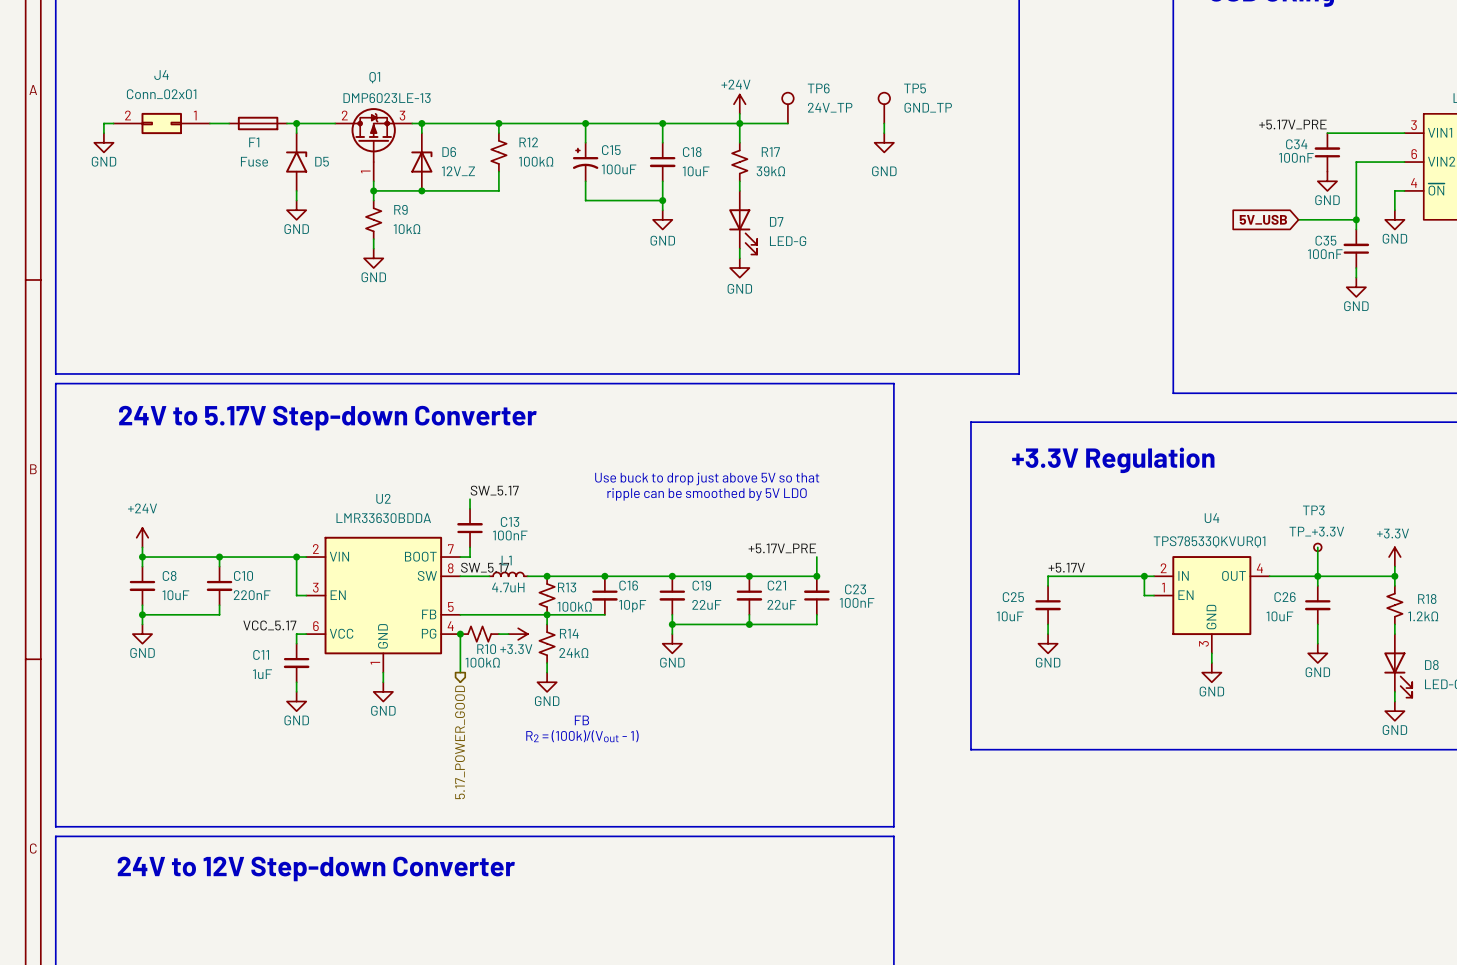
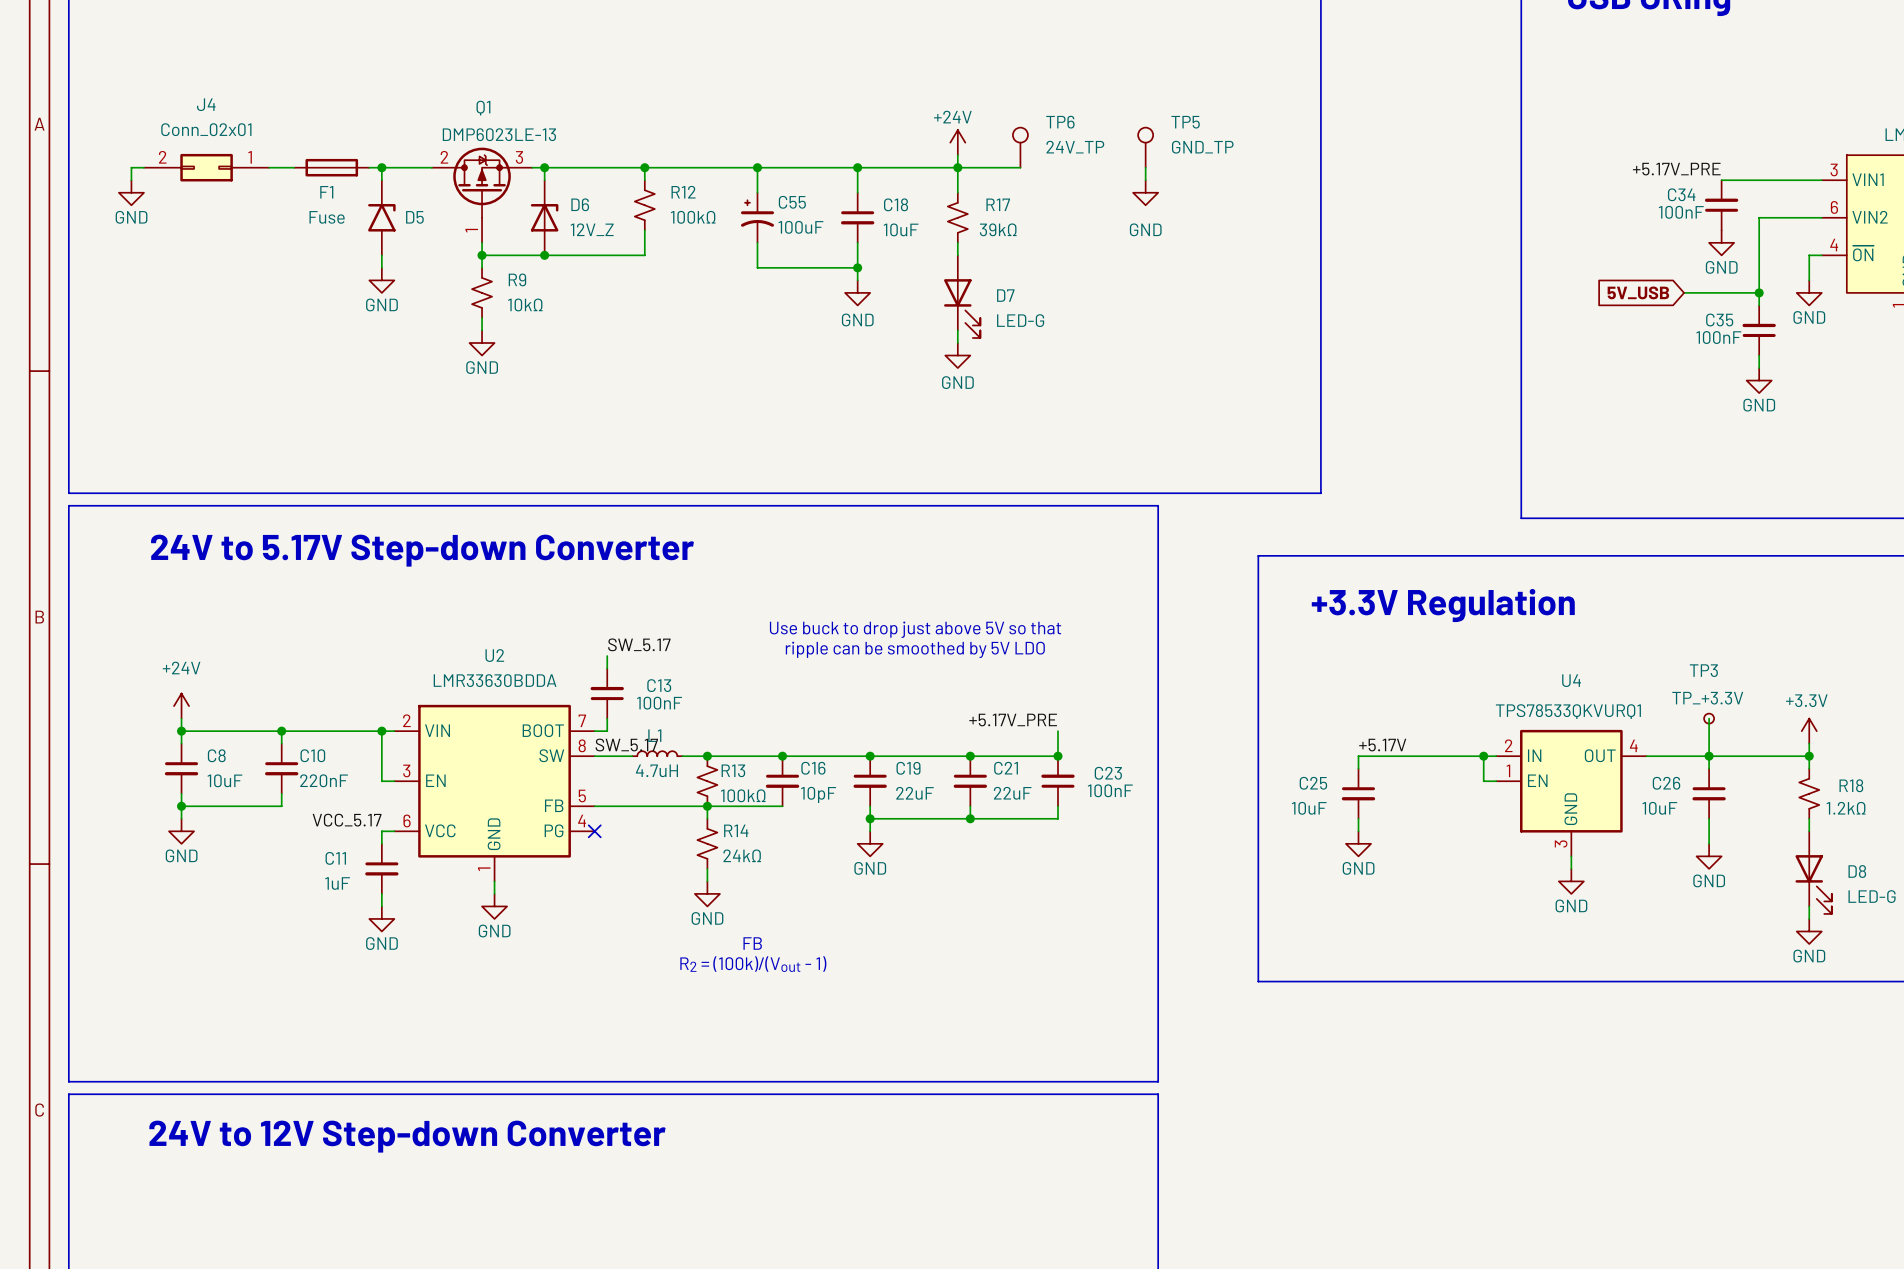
C15 name: C15 (611, 150) -> C55 (792, 202)
wire: (460, 634) (460, 672) -> none
junction: (460, 634) -> none
no-connect mark: none -> (594, 831)
R10: 100kΩ (479, 634) -> none
wire: (498, 634) (508, 634) -> none
power symbol: +3.3V (518, 634) -> none
hierarchical label: 5.17_POWER_GOOD (460, 742) -> none

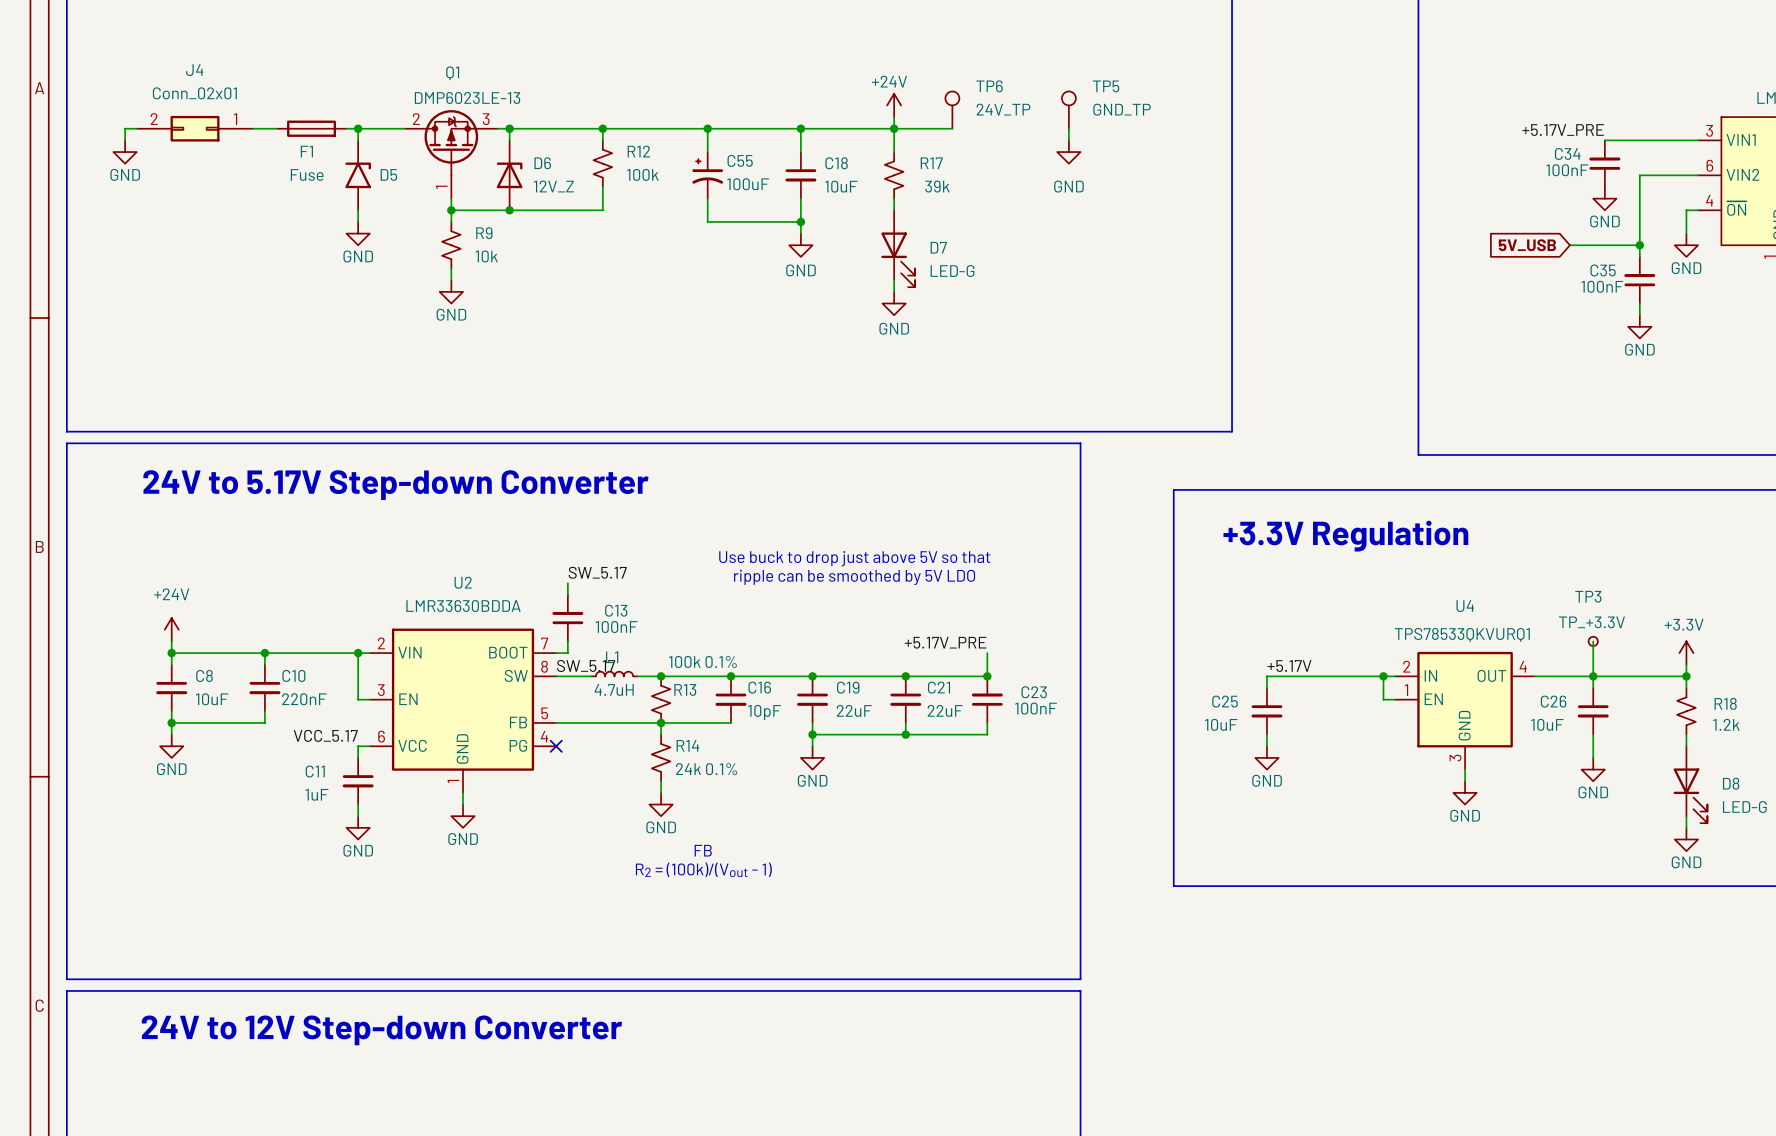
R12 value: 100kΩ (693, 217) -> 100k (642, 174)
R17 value: 39kΩ (998, 229) -> 39k (937, 186)
R9 value: 10kΩ (525, 304) -> 10k (486, 256)
R13 value: 100kΩ (743, 795) -> 100k 0.1% (702, 661)
R18 value: 1.2kΩ (1846, 808) -> 1.2k (1726, 724)
R14 value: 24kΩ (742, 855) -> 24k 0.1% (706, 769)

